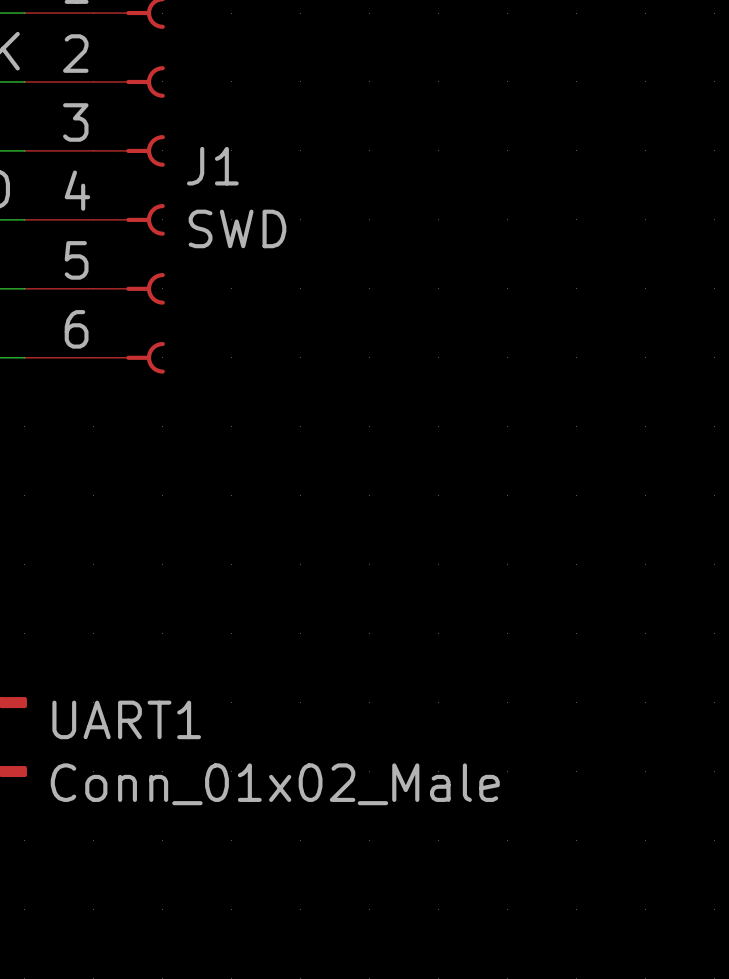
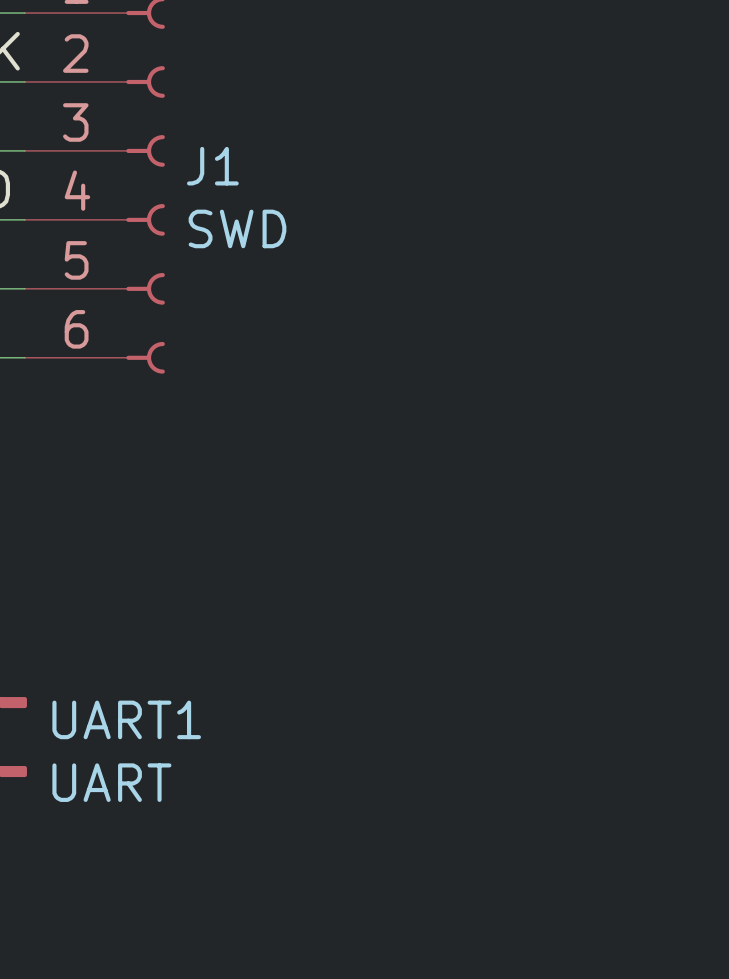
UART1 value: Conn_01x02_Male (275, 784) -> UART (111, 782)

